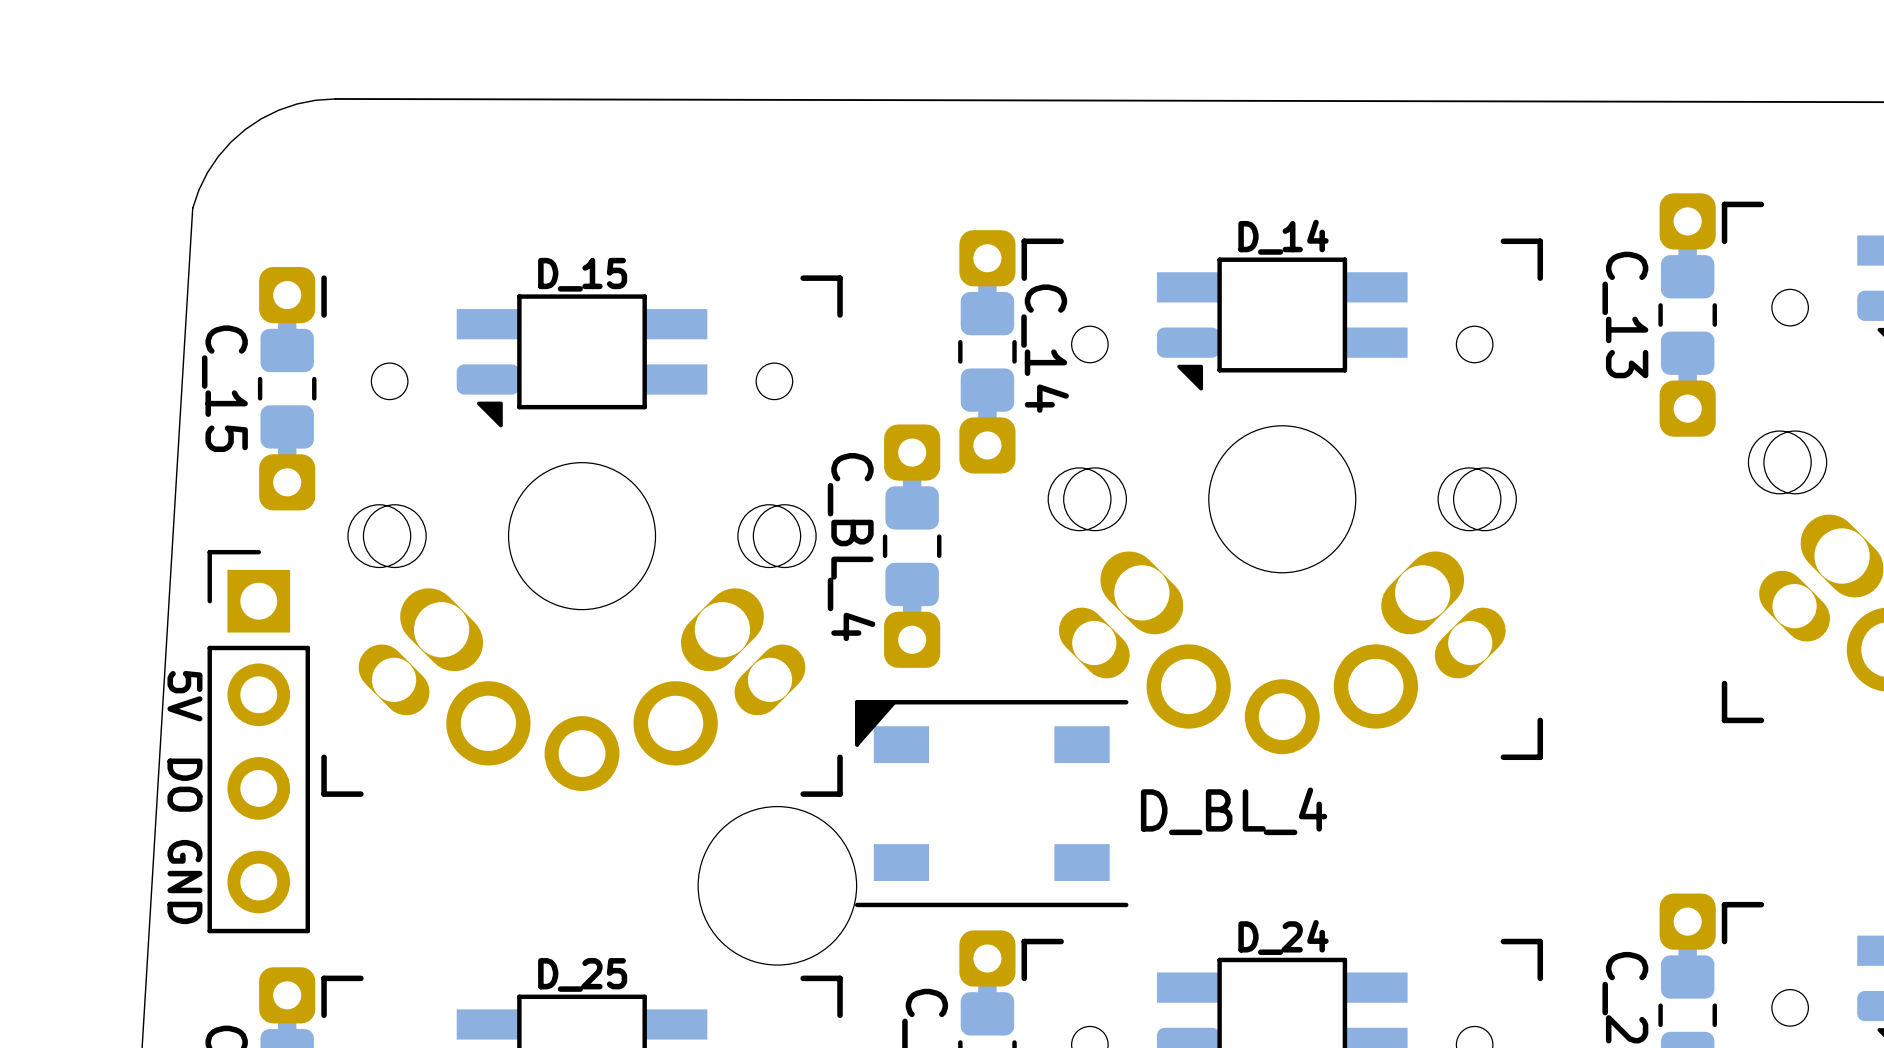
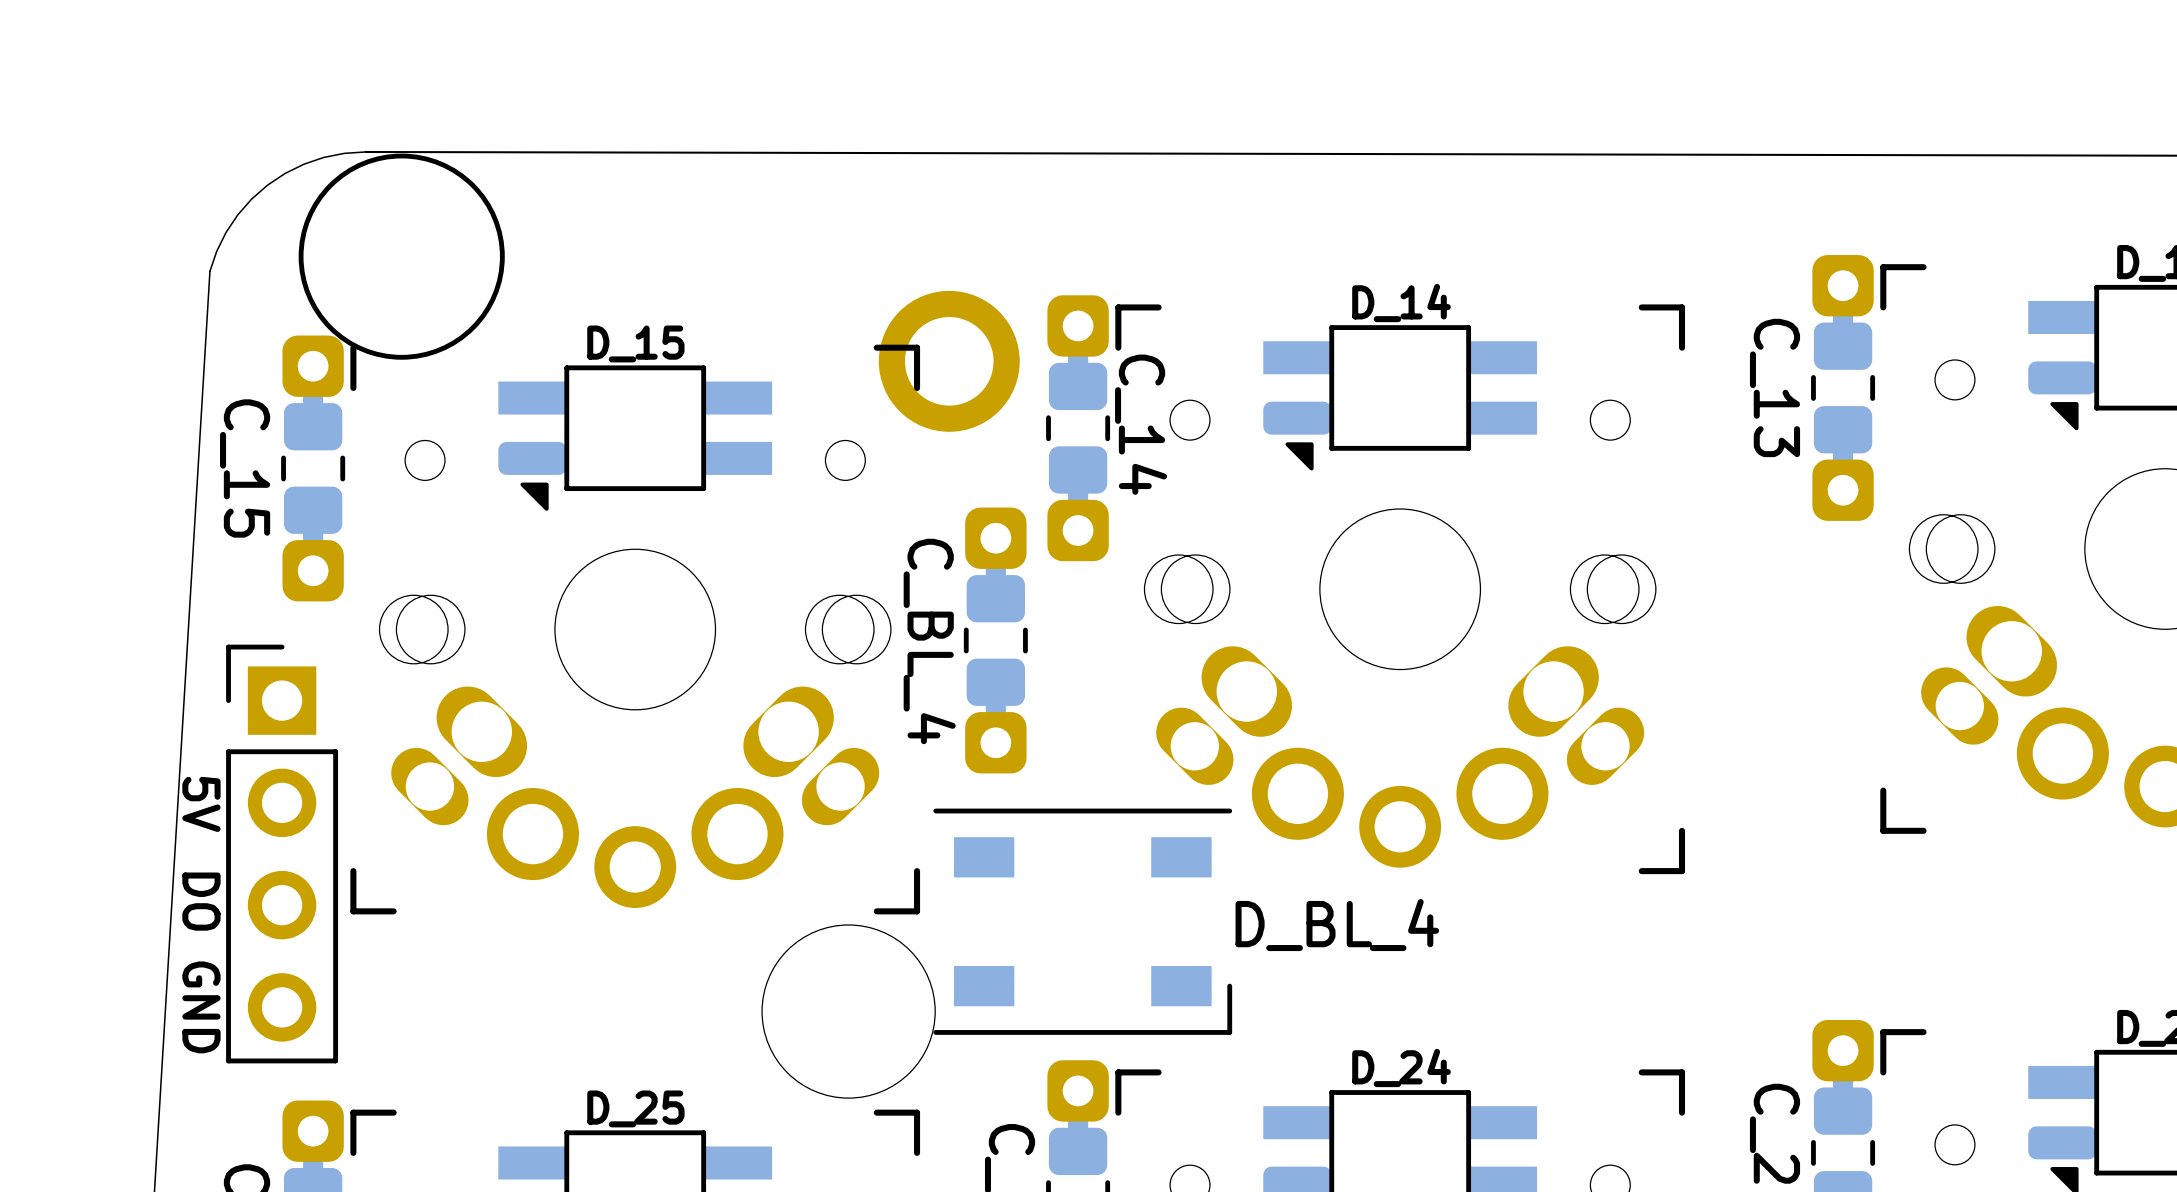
drawing: none -> [298, 153, 505, 360]
part: none -> (949, 361)
D_BL_4 footprint: [854, 700, 1129, 908] -> [933, 808, 1233, 1035]

